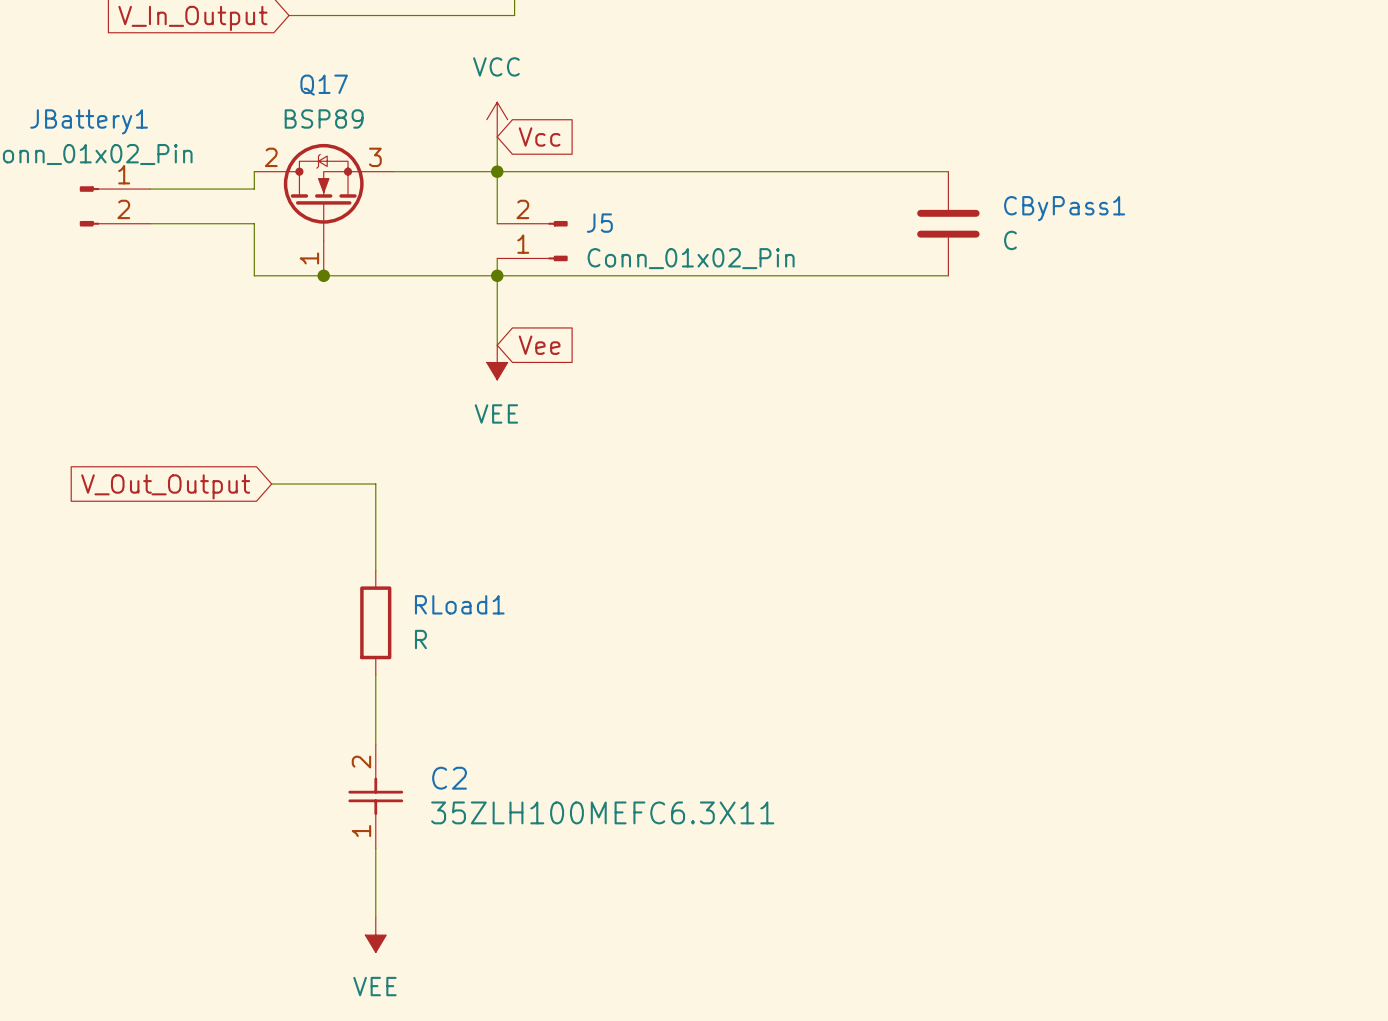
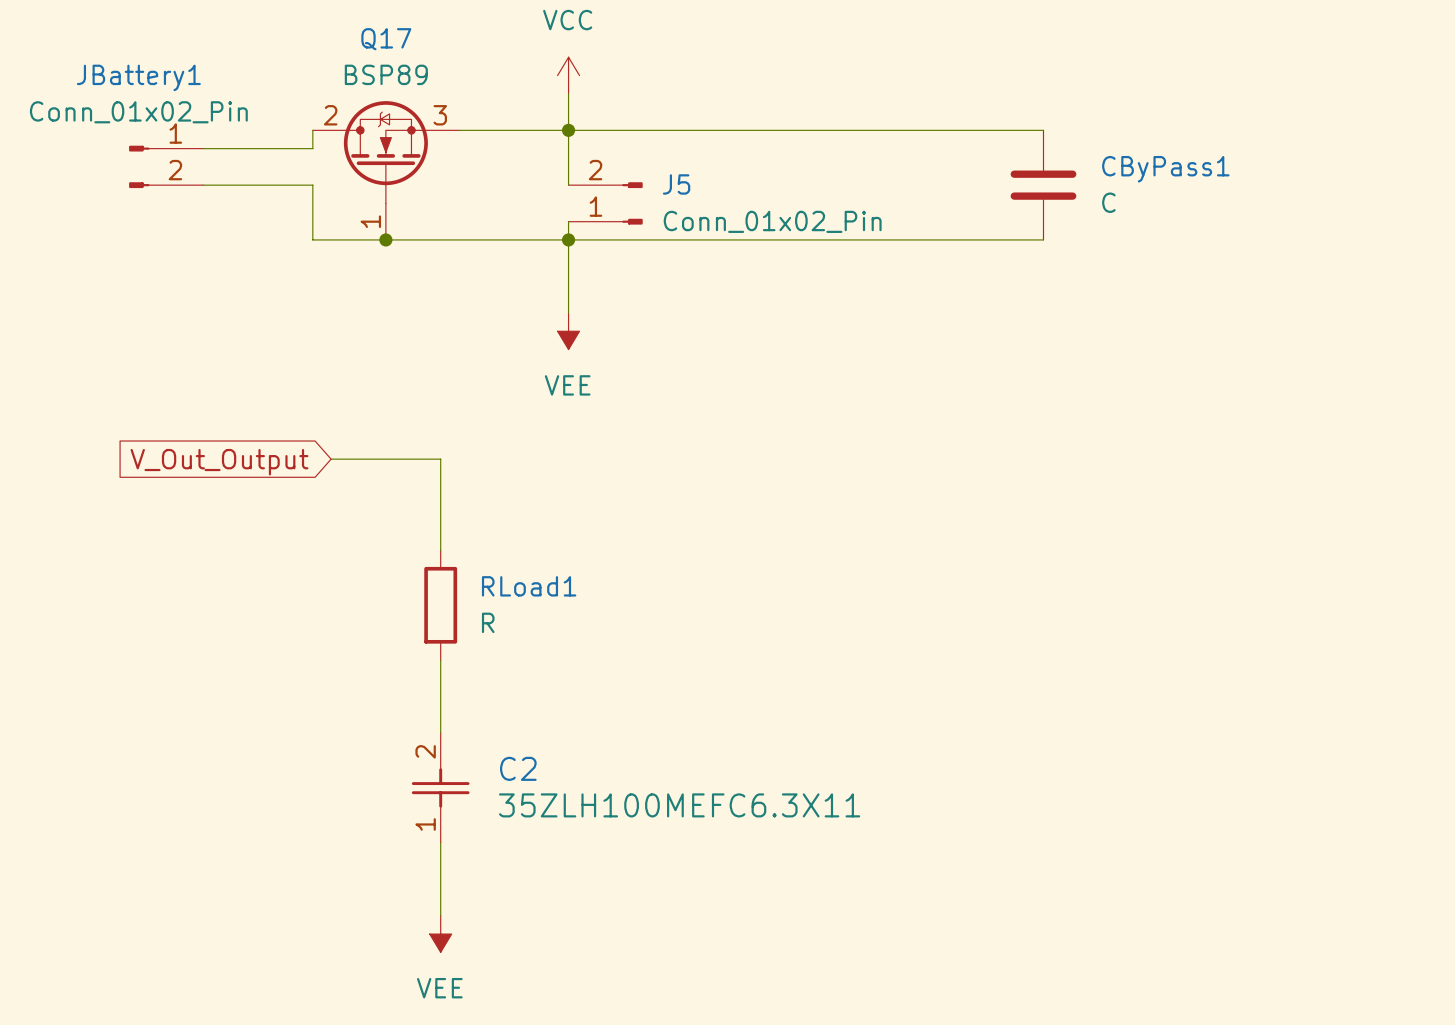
global label: Vcc (539, 136) -> none
global label: Vee (539, 345) -> none

